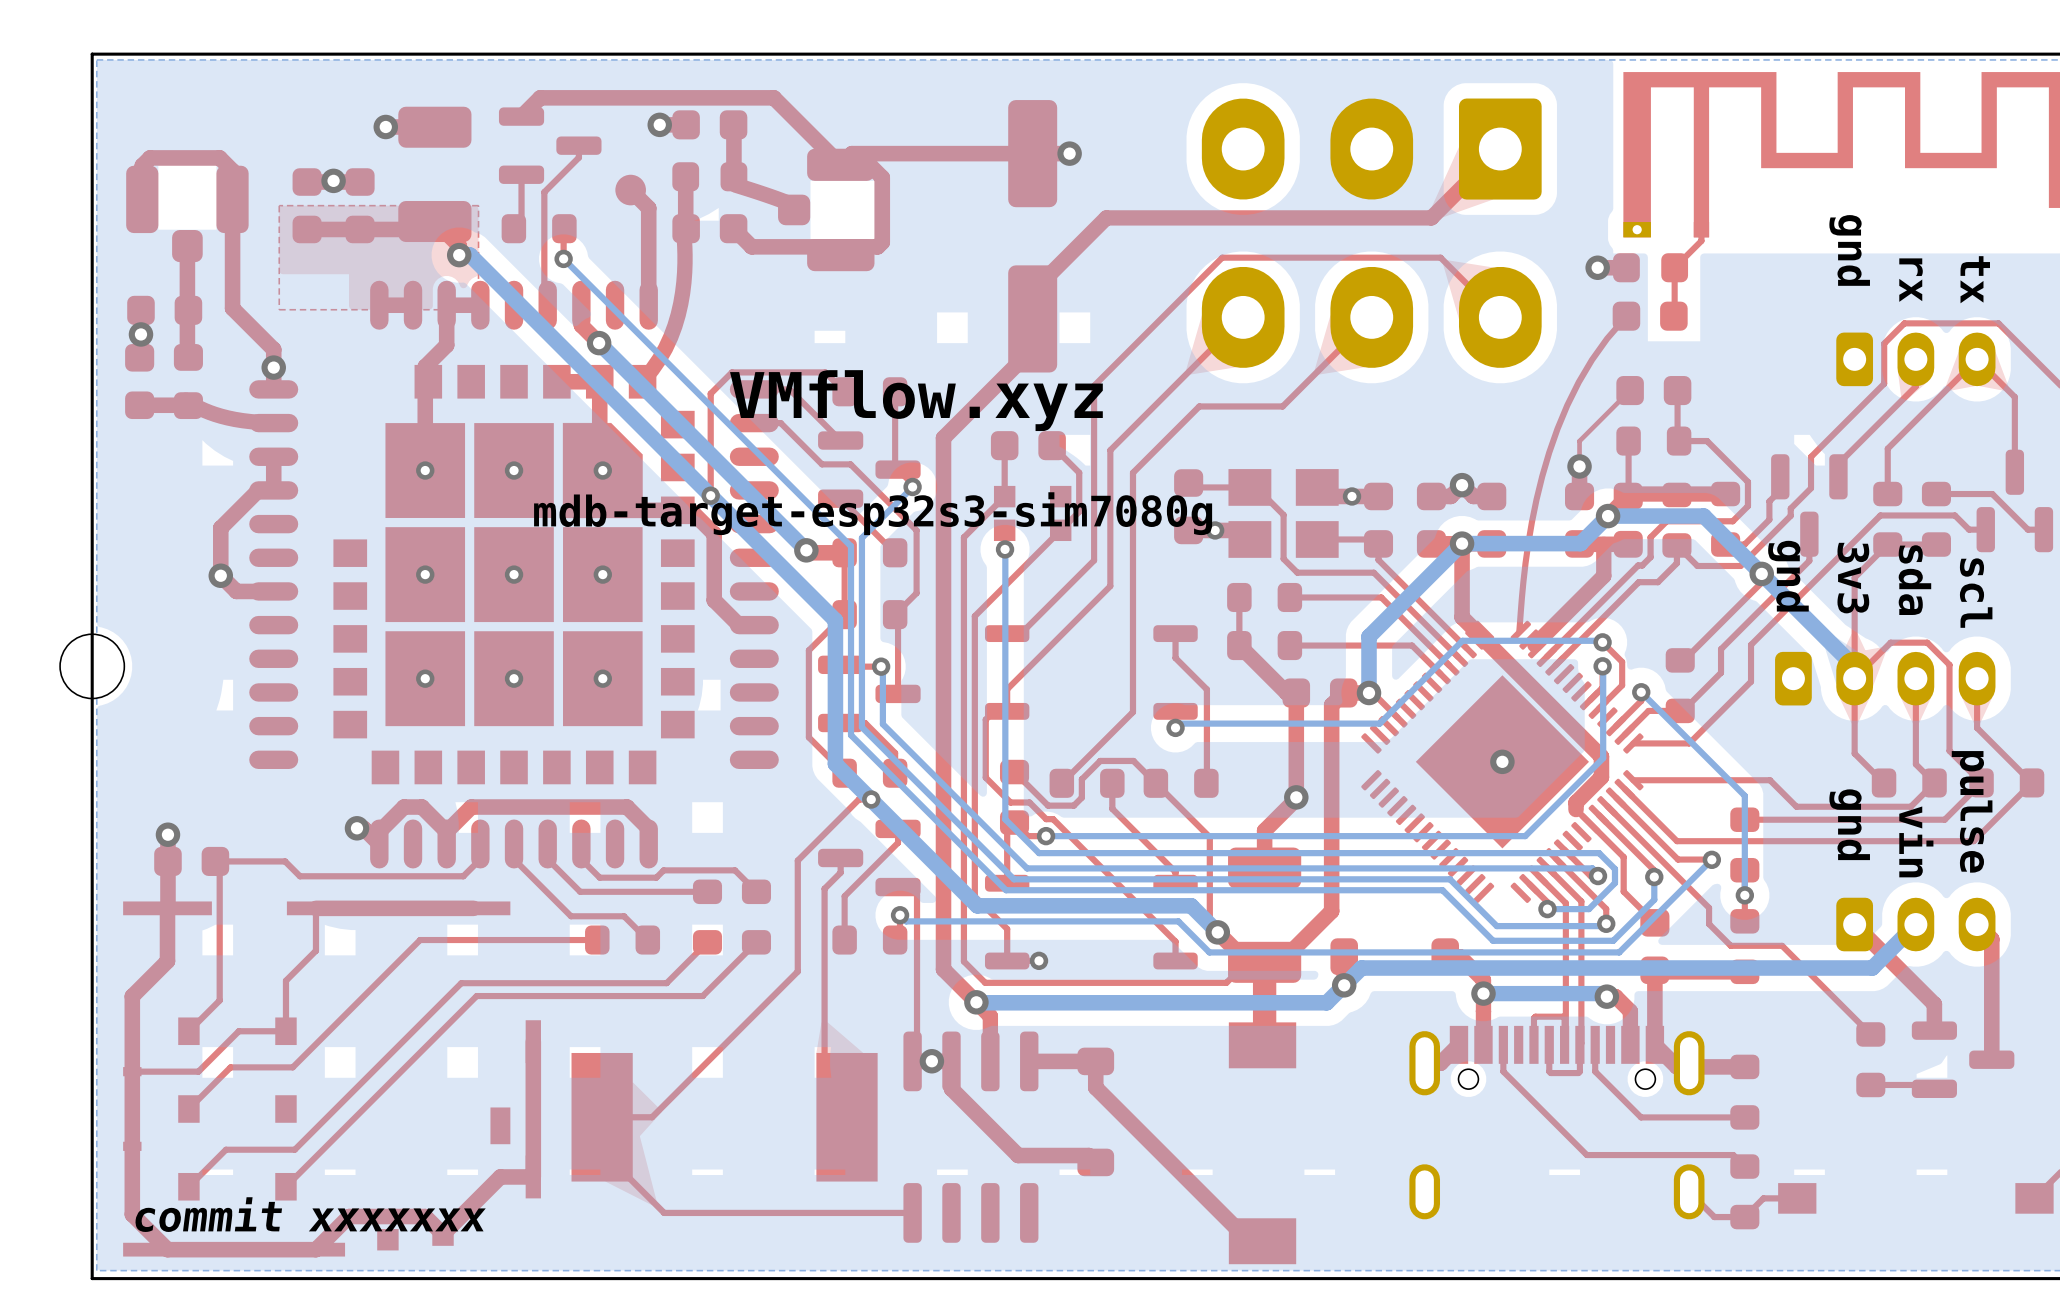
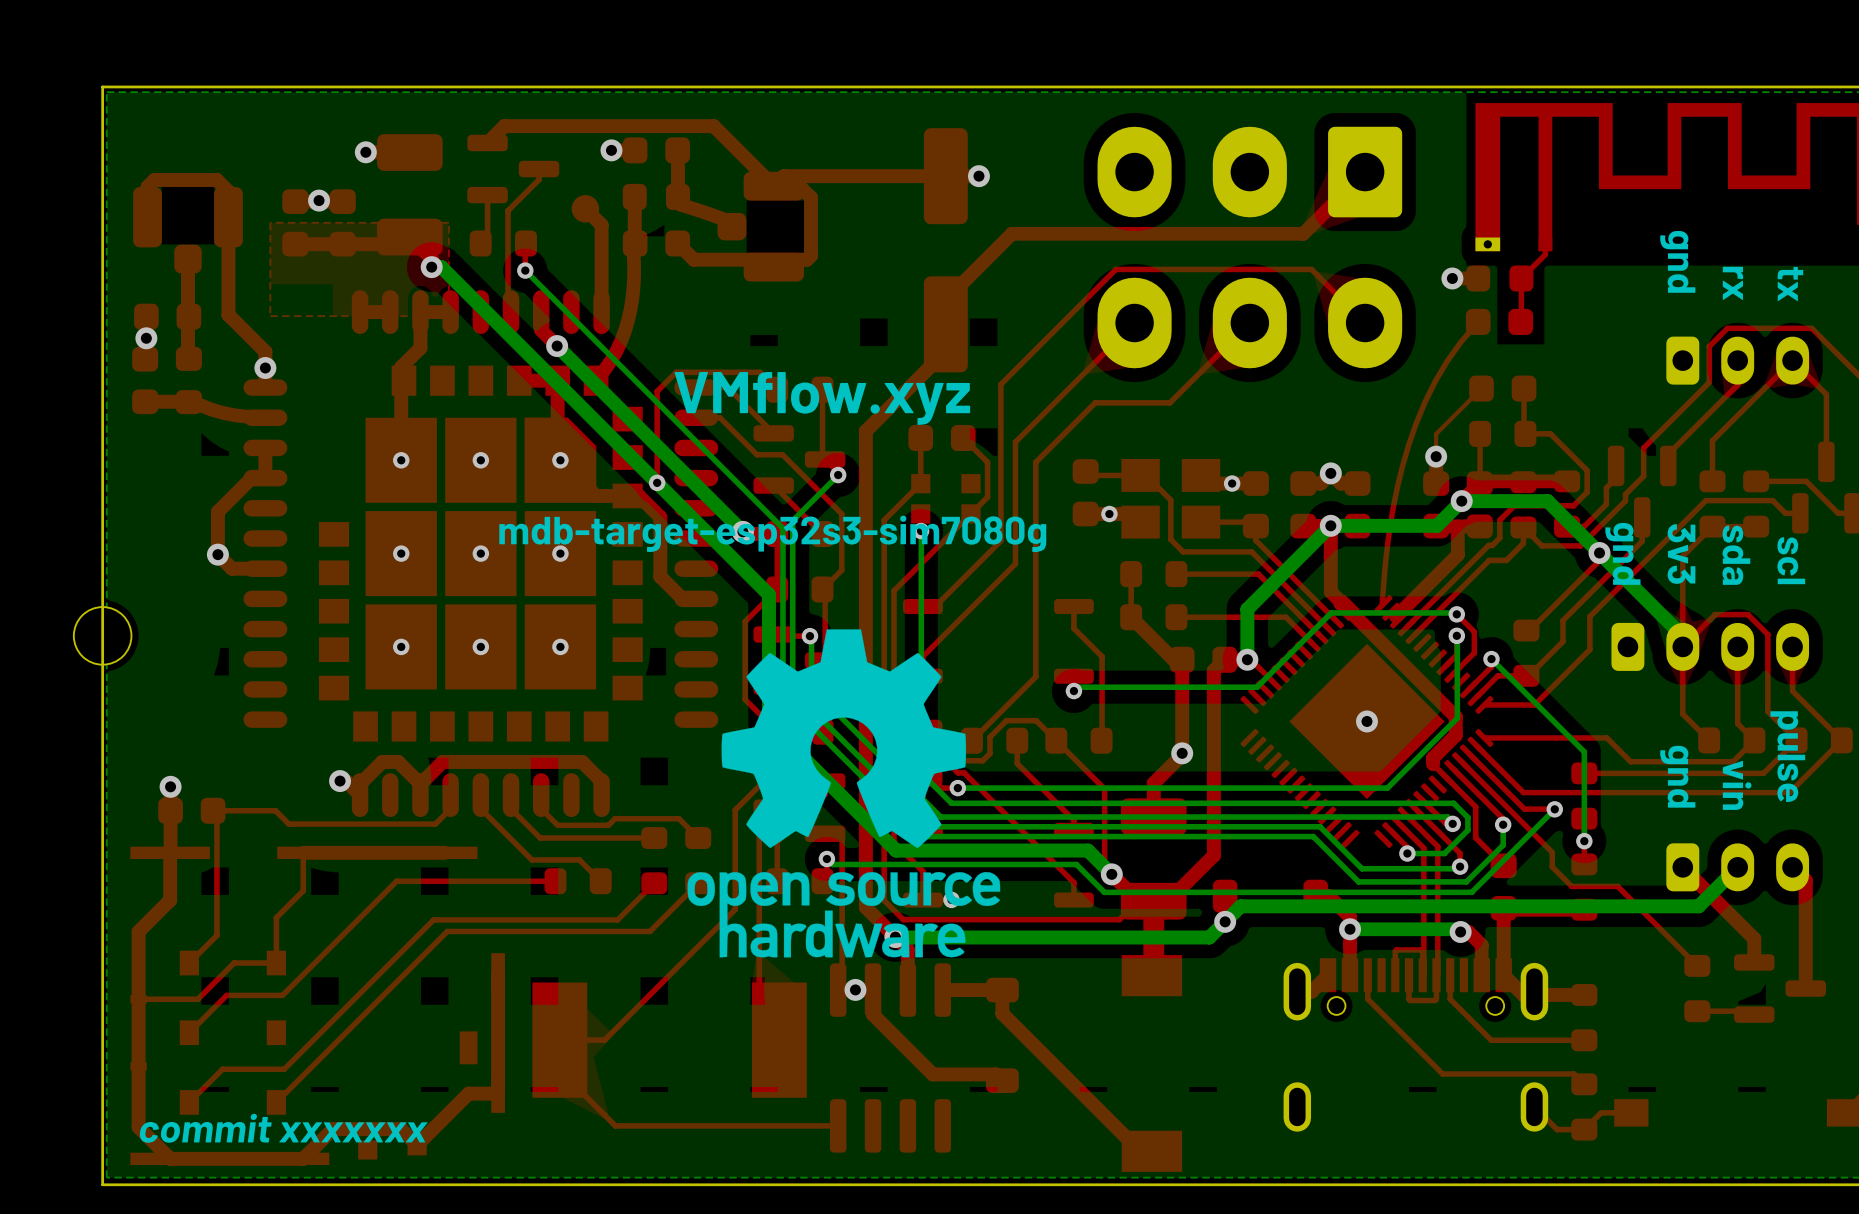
text position: mdb-target-esp32s3-sim7080g (873, 513) -> mdb-target-esp32s3-sim7080g (772, 533)
drawing: none -> [687, 629, 1001, 958]

